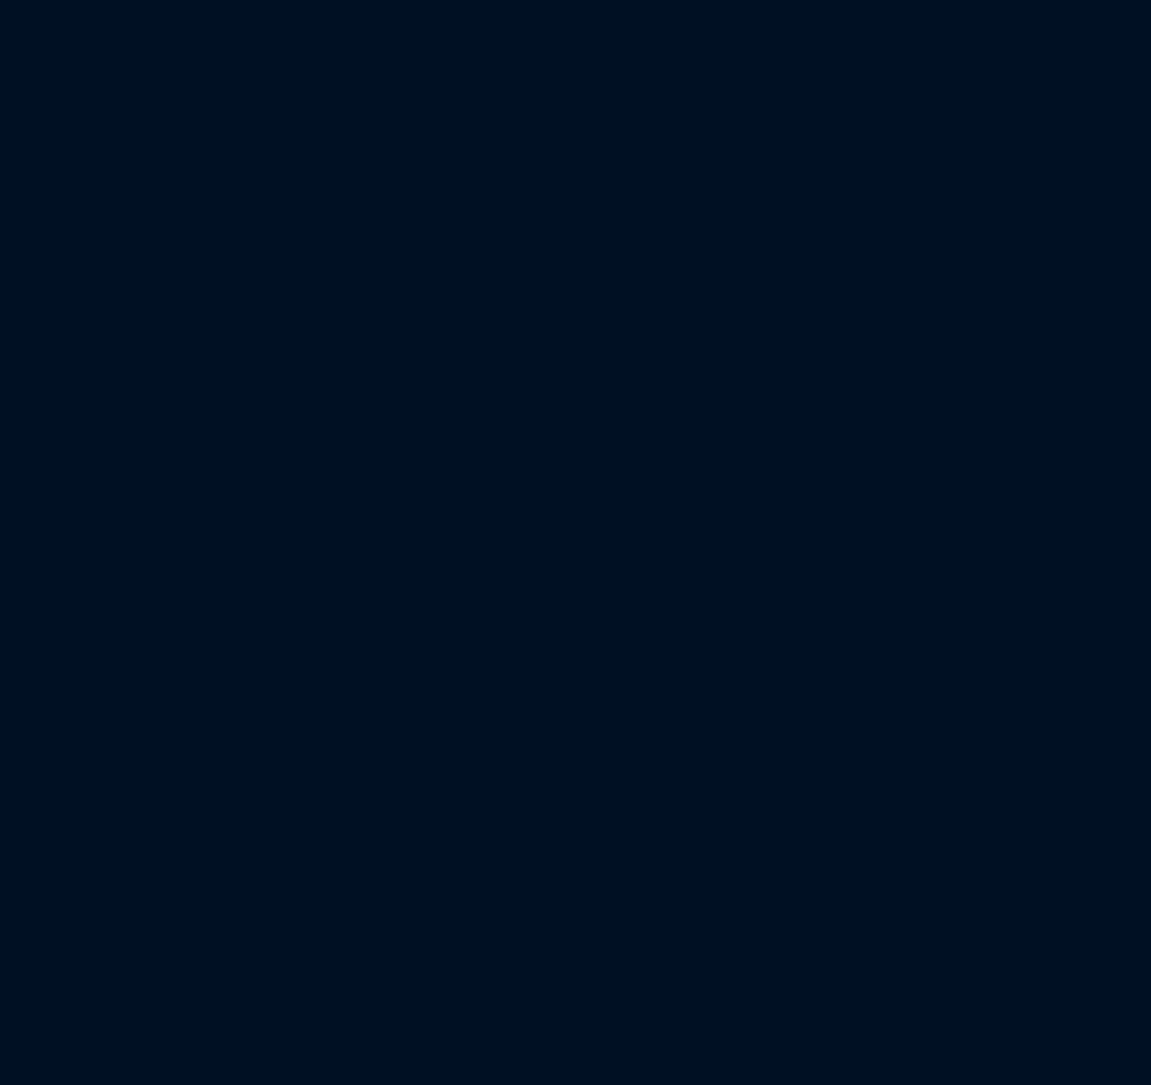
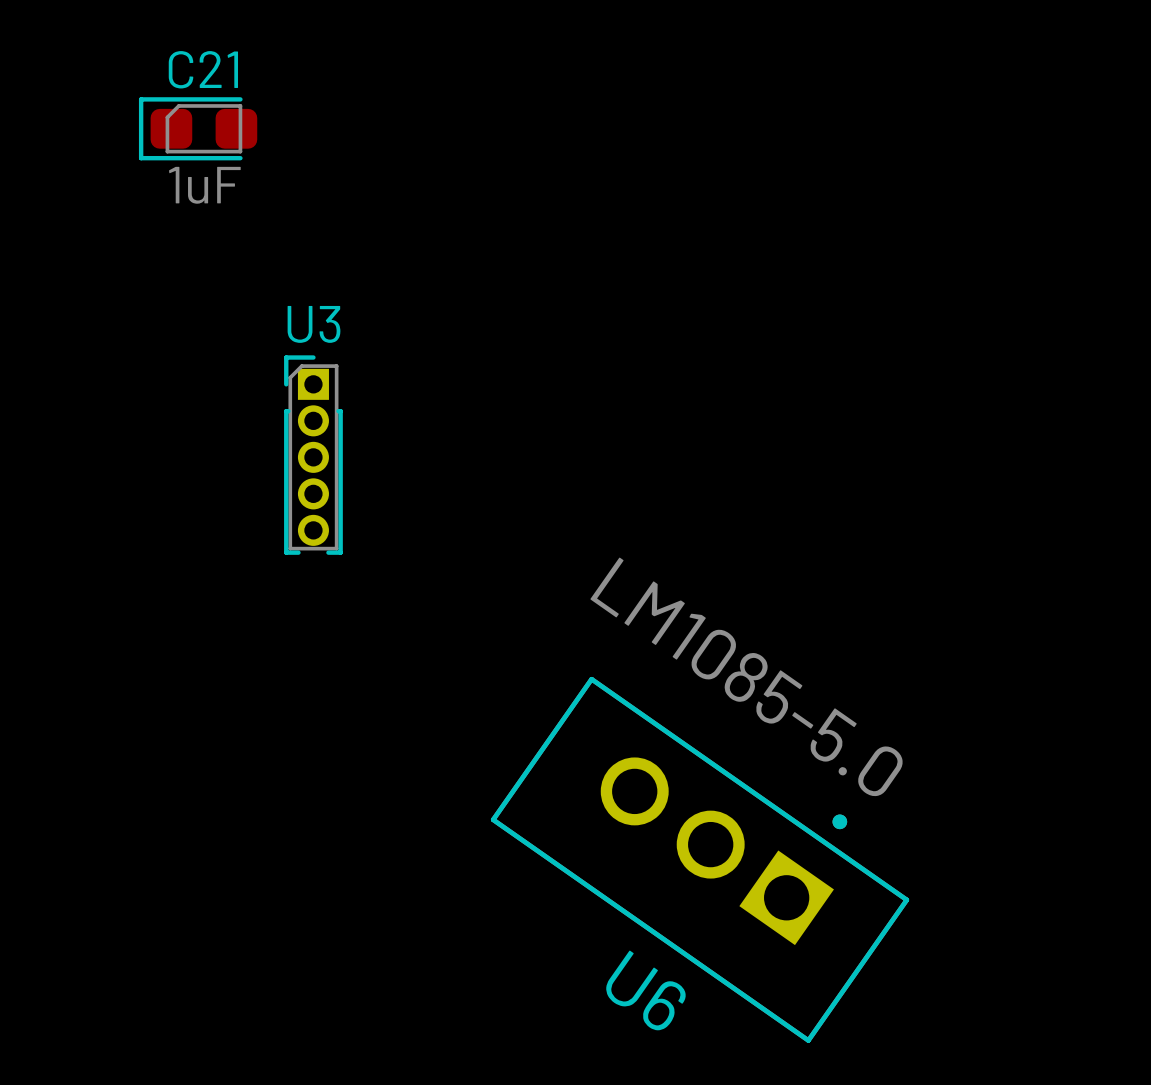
C21: none -> 1uF (198, 128)
U3: none -> (313, 455)
U6: none -> LM1085-5.0 (700, 859)

